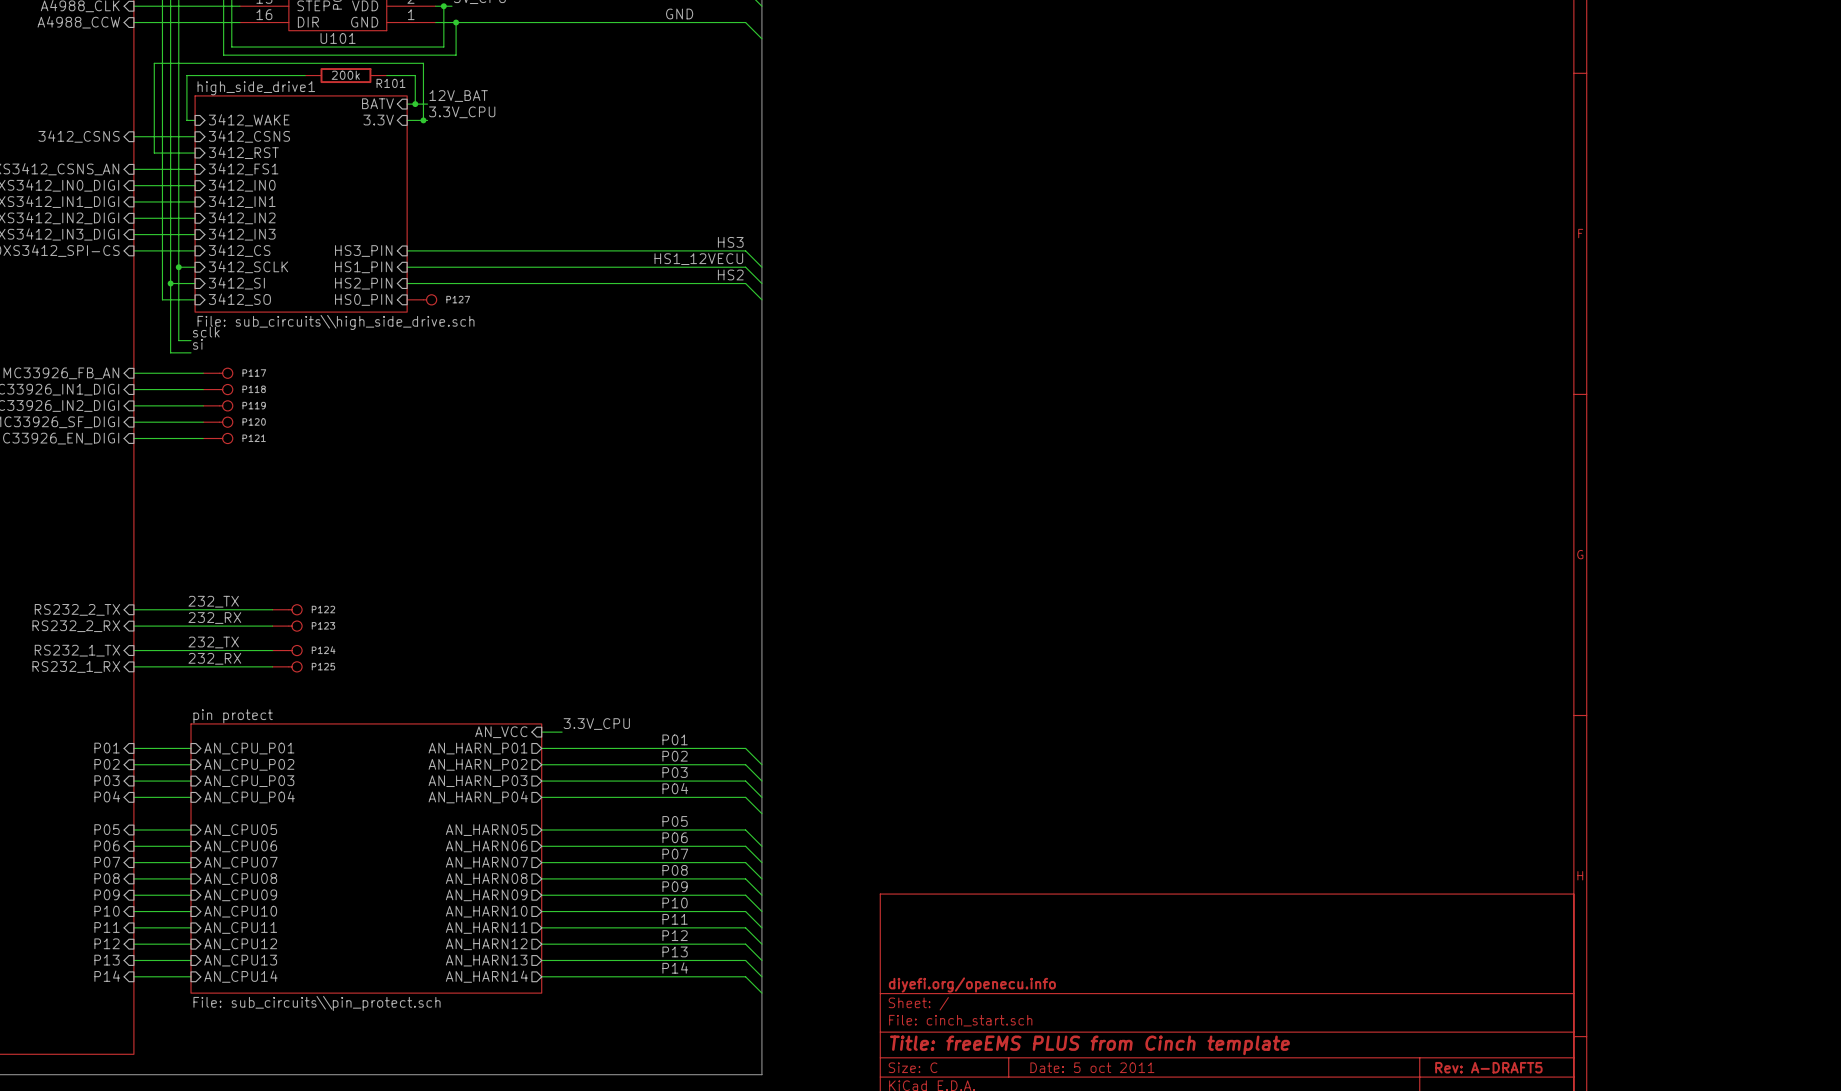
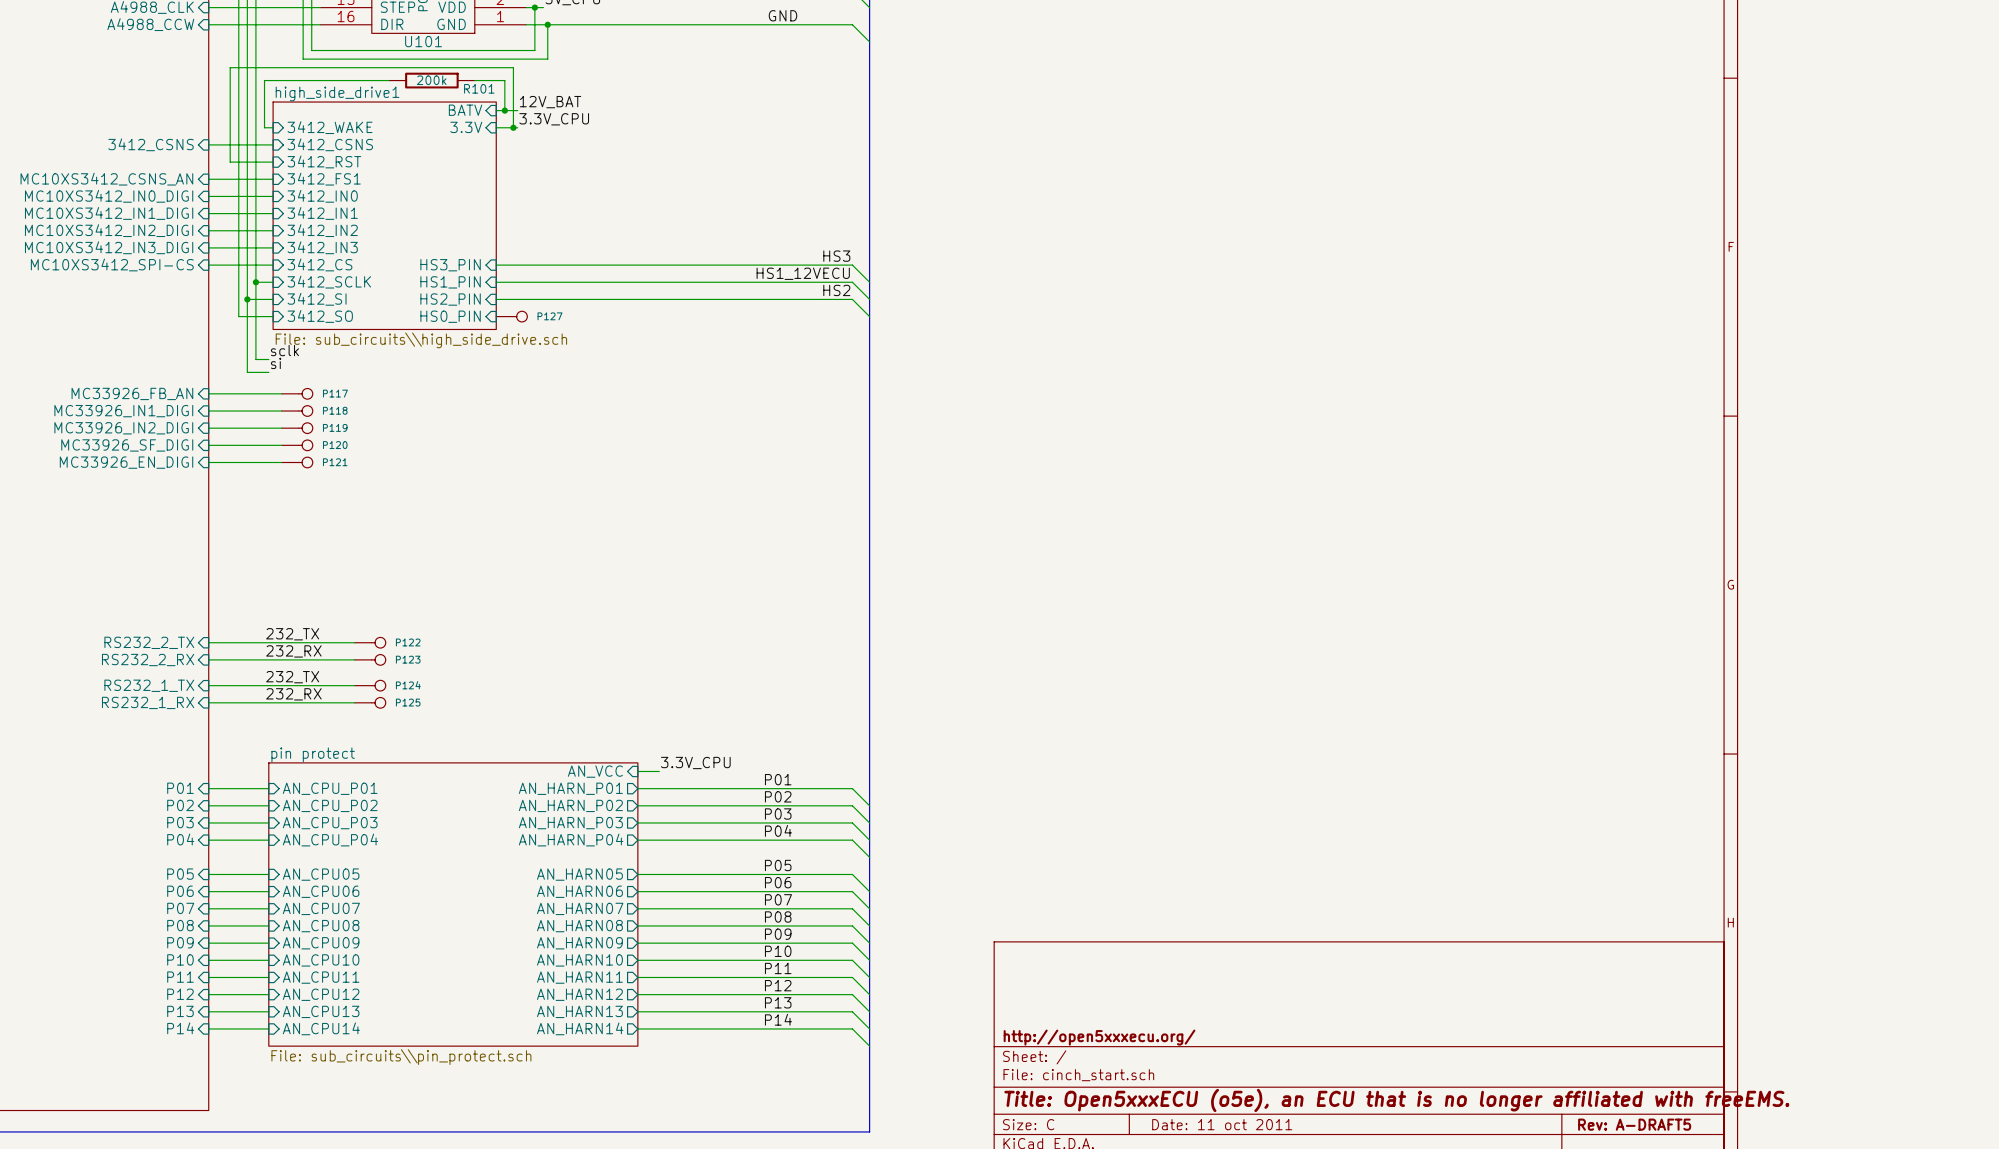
title block: diyefi.org/openecu.info (972, 984) -> http://open5xxxecu.org/ (1099, 1037)
title block: Title: freeEMS PLUS from Cinch template (1089, 1045) -> Title: Open5xxxECU (o5e), an ECU that is no longer affiliated with freeEMS. (1396, 1100)
title block: Date: 5 oct 2011 (1092, 1067) -> Date: 11 oct 2011 (1222, 1124)

